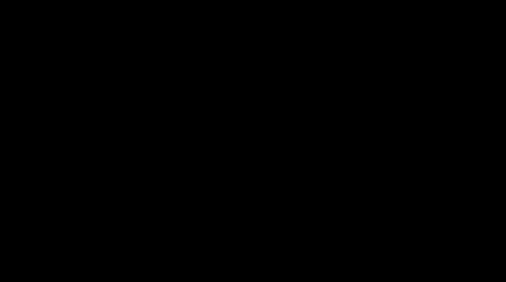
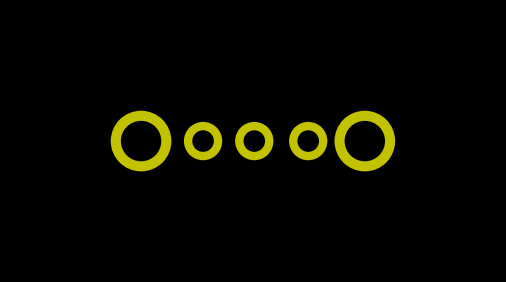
part: none -> (252, 141)

